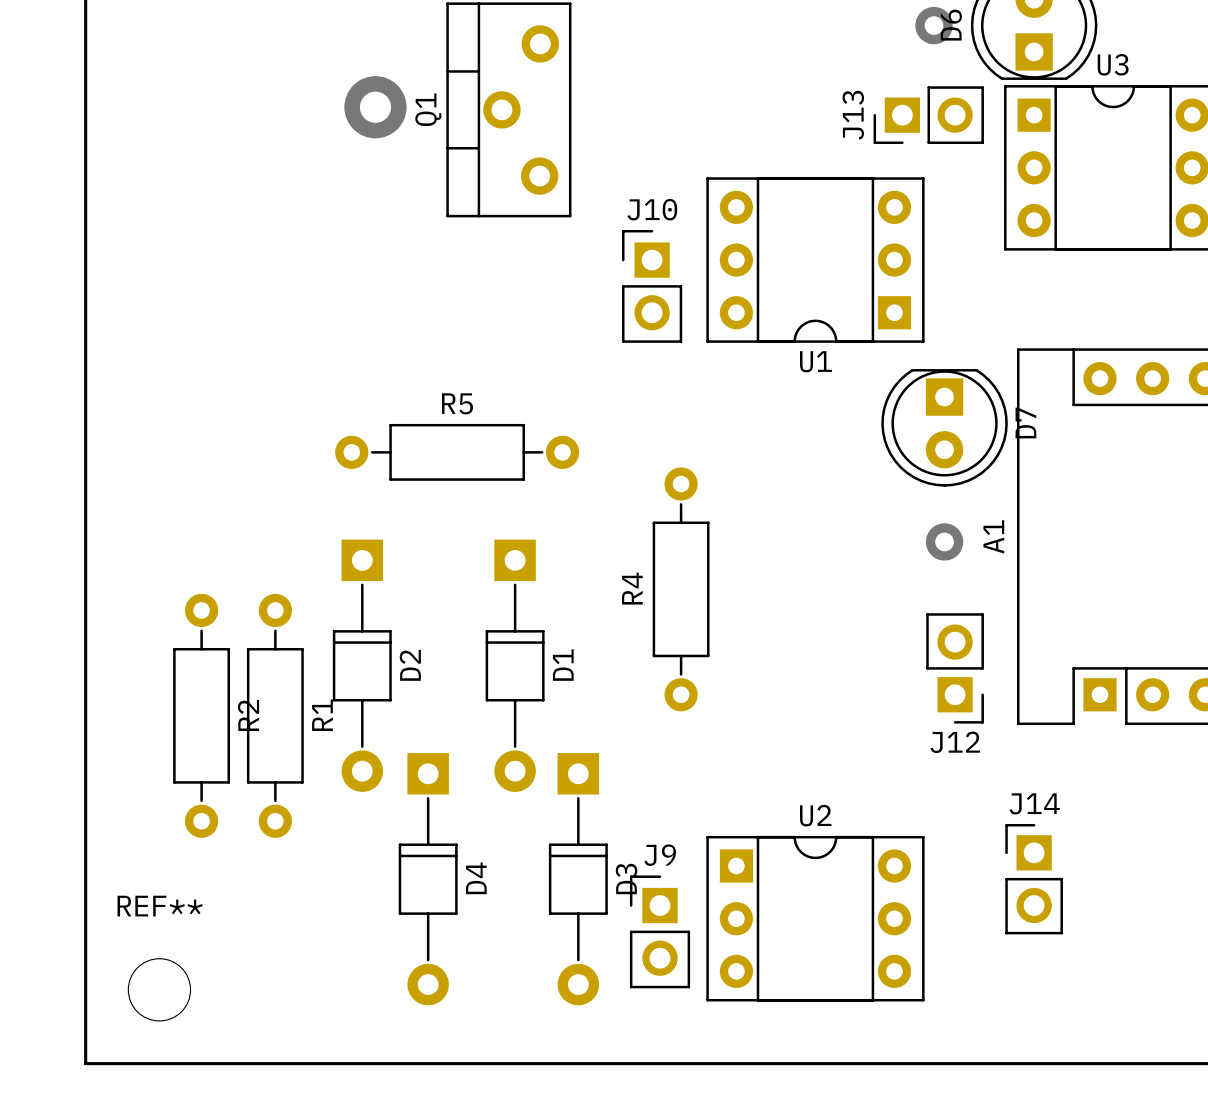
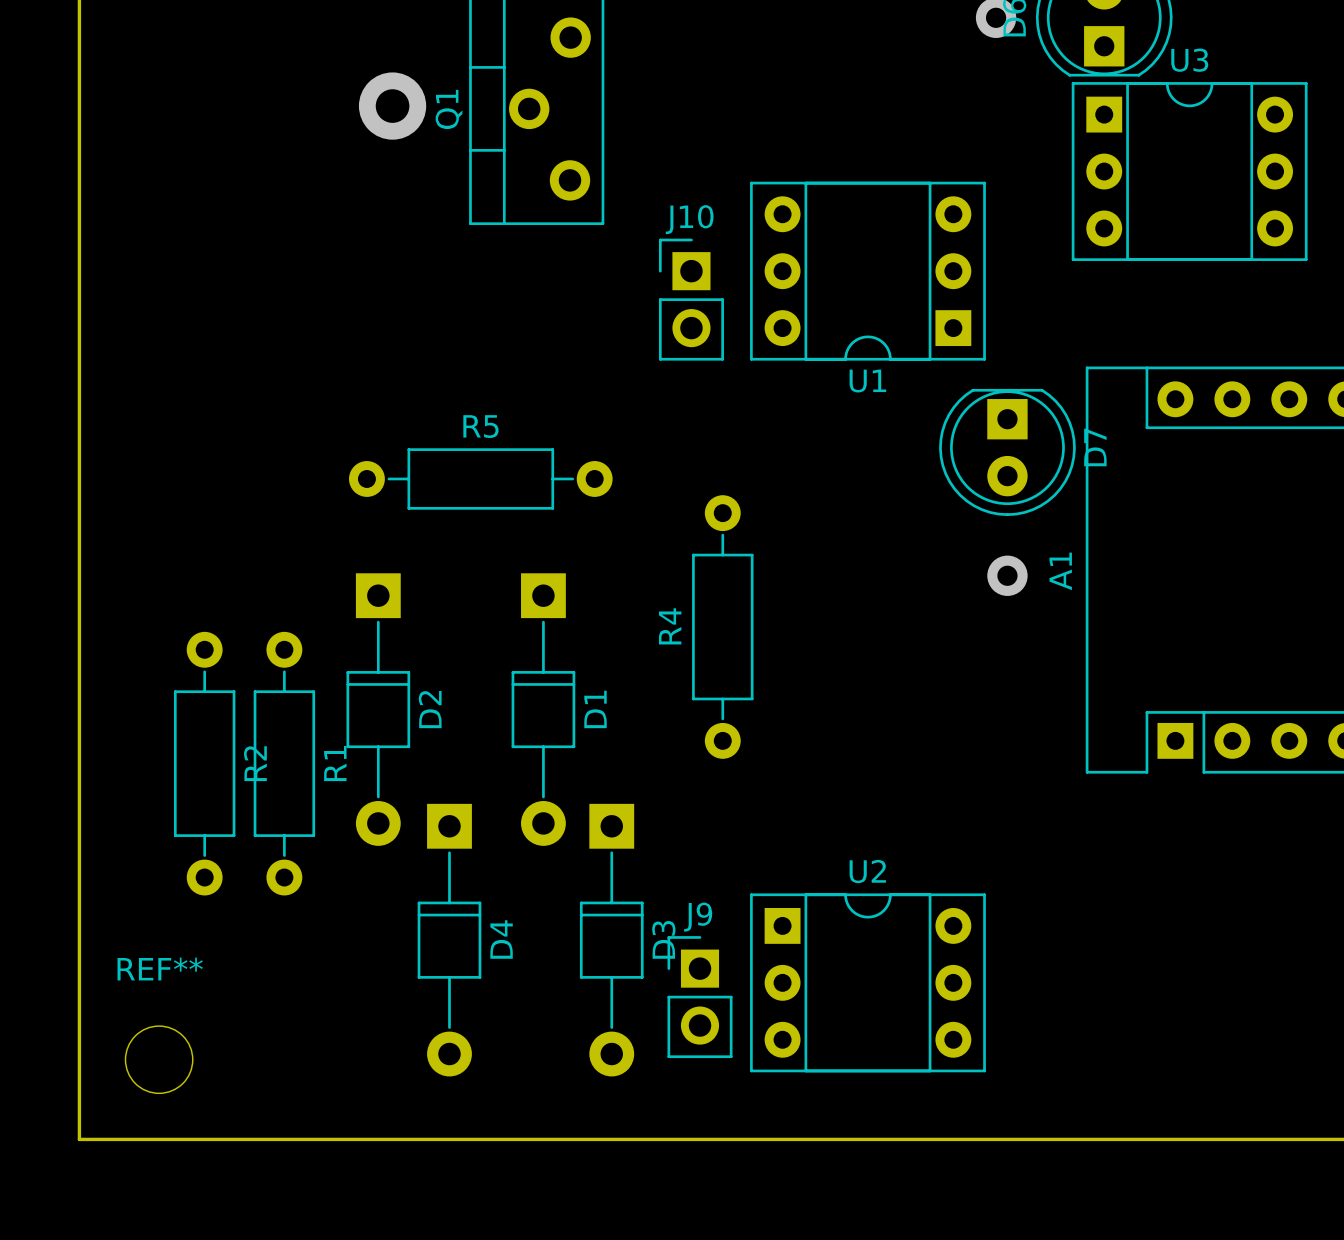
J13: (928, 115) -> none
J12: (955, 668) -> none
J14: (1034, 879) -> none

